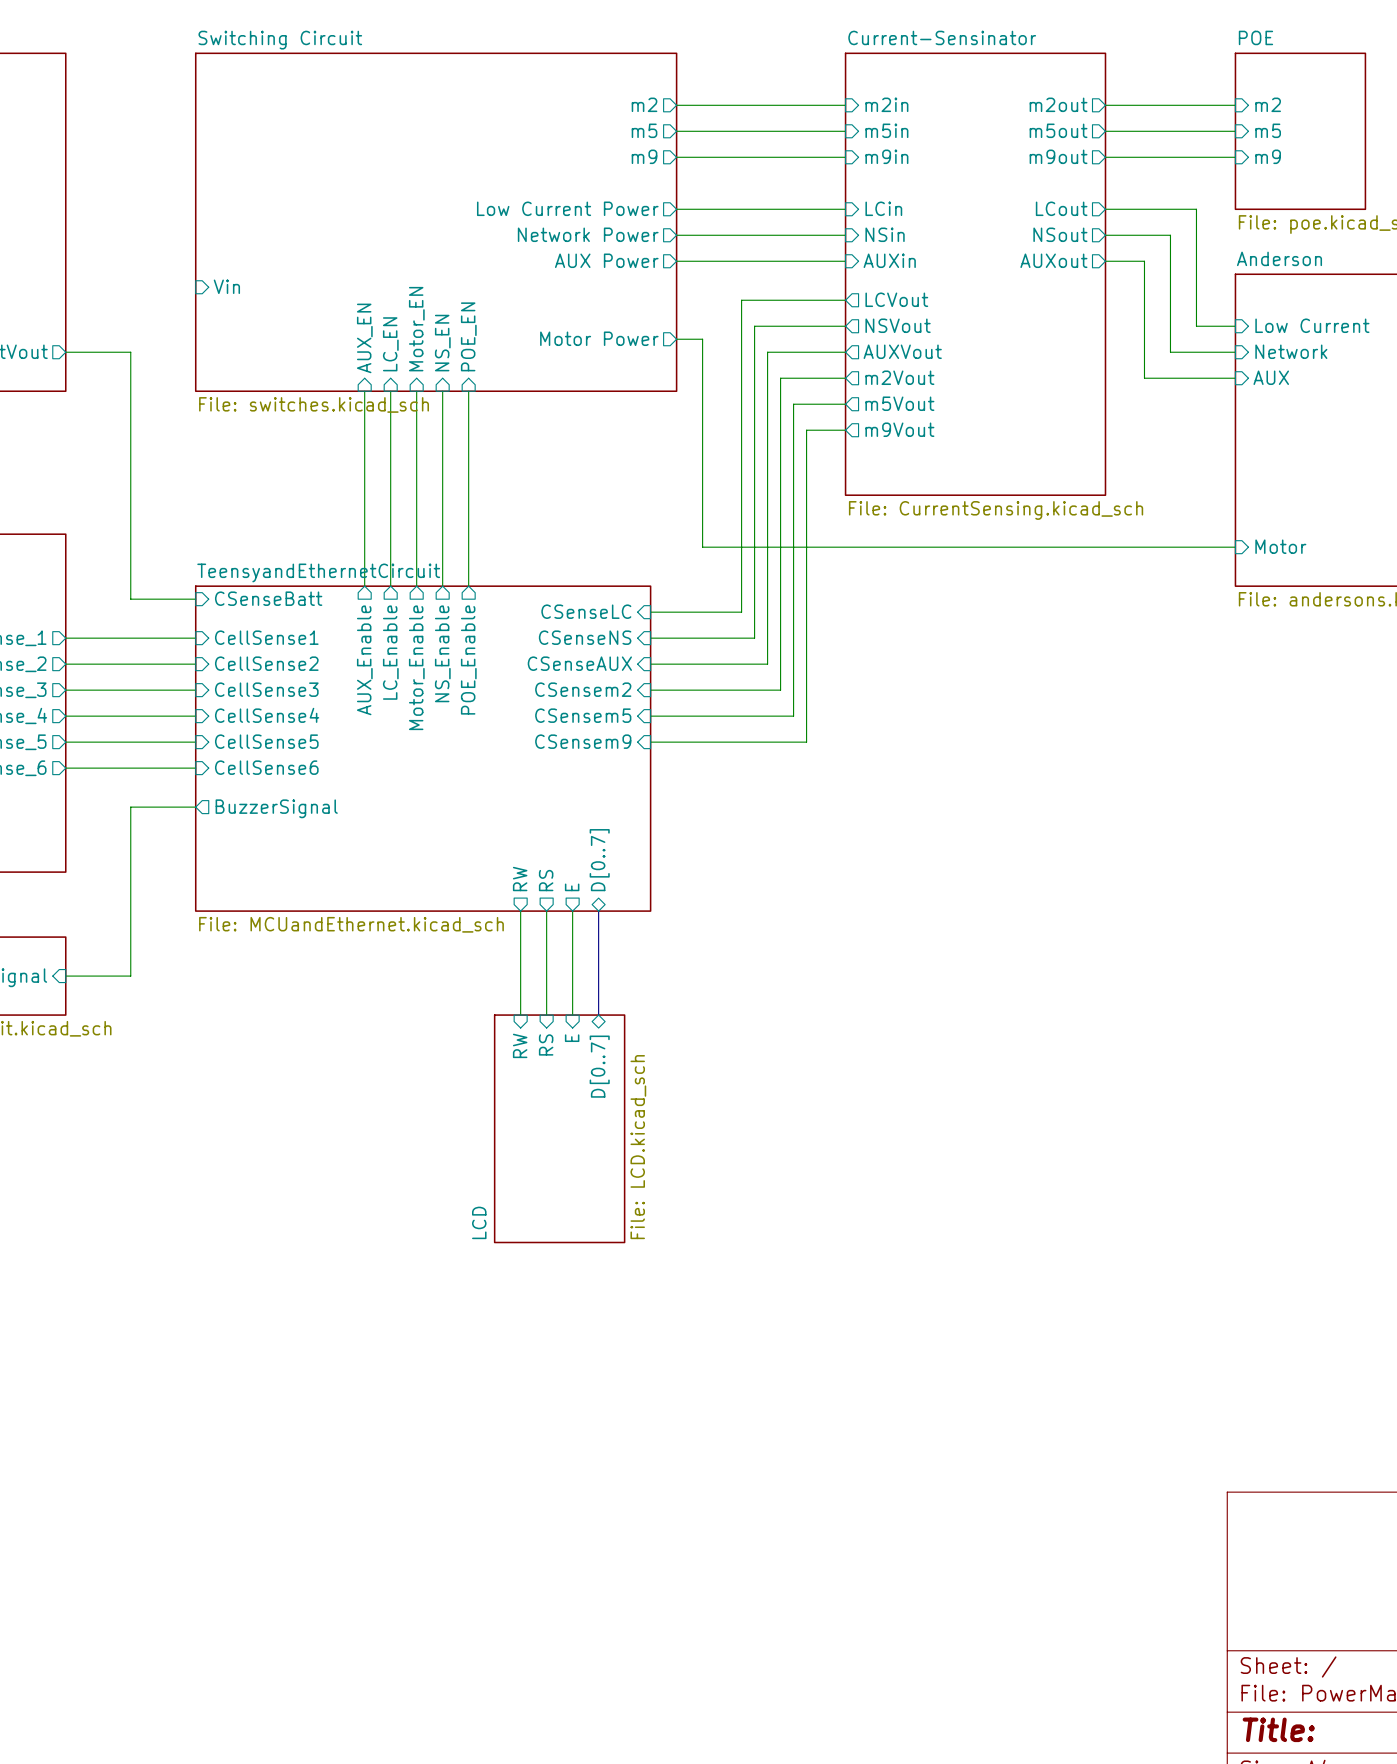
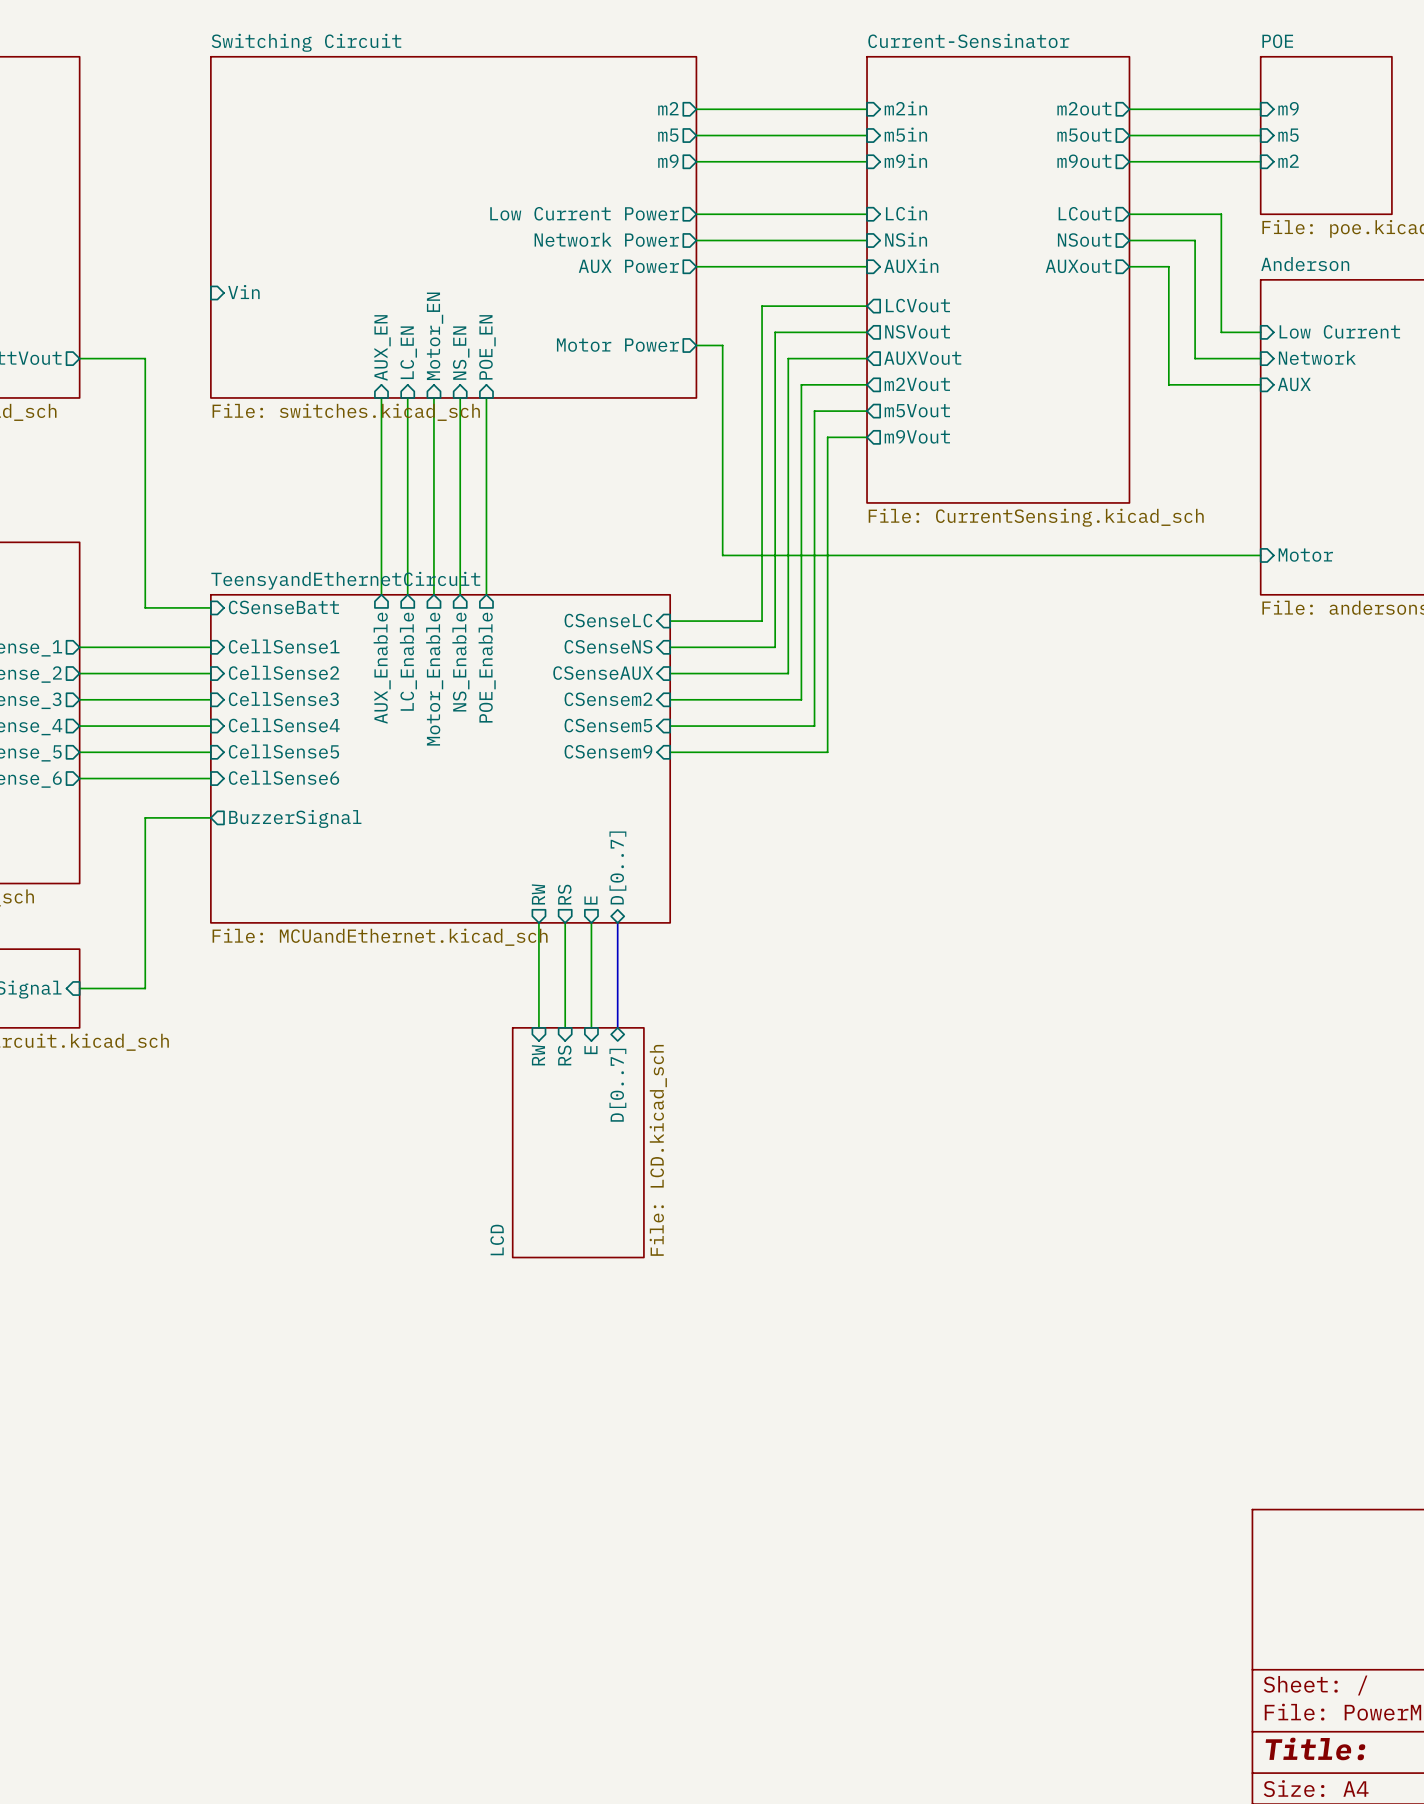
sheet pin: m2 (1268, 104) -> m9 (1288, 108)
sheet pin: m9 (1268, 156) -> m2 (1288, 161)

